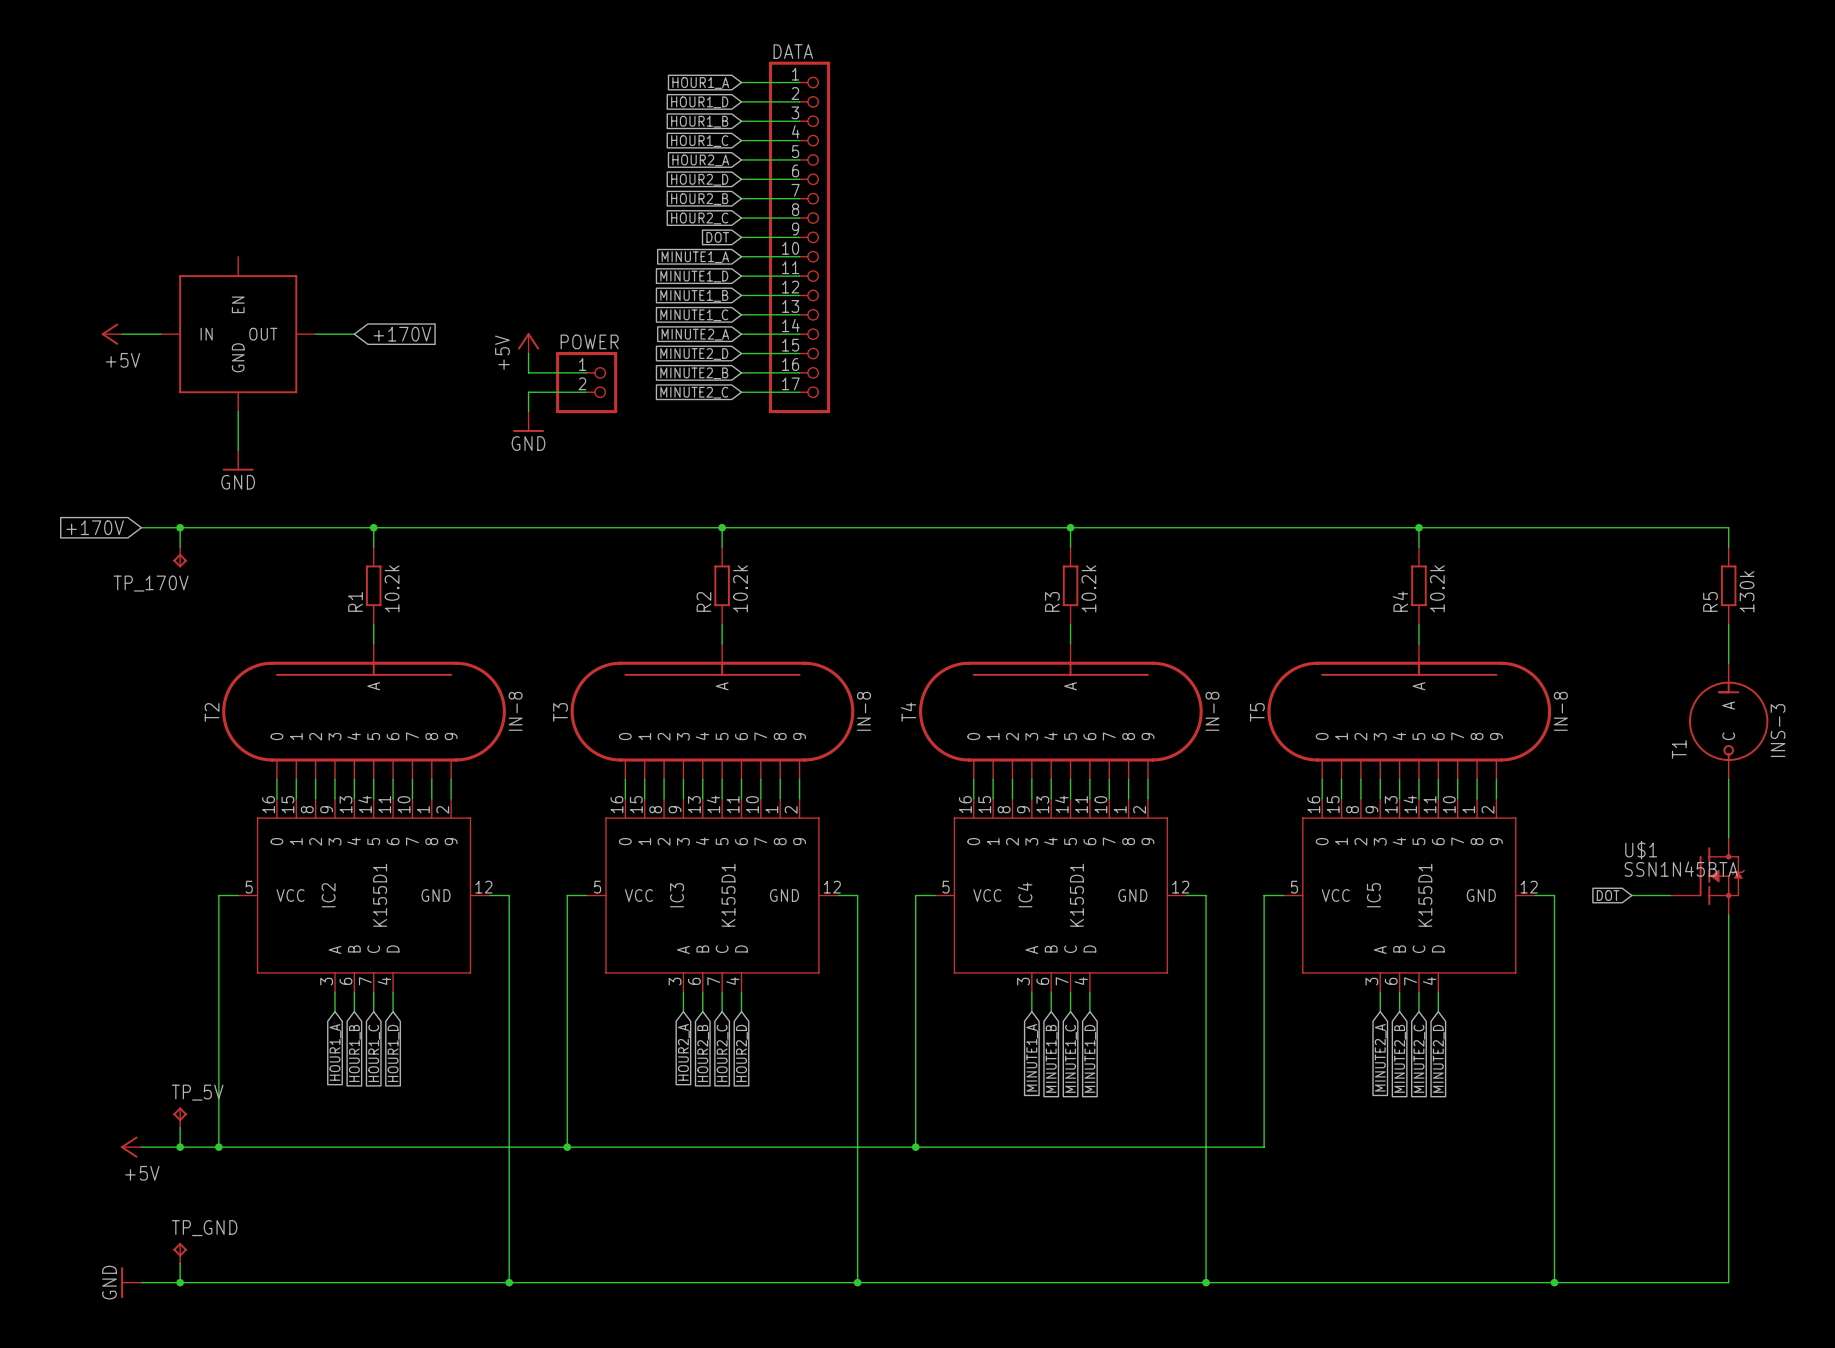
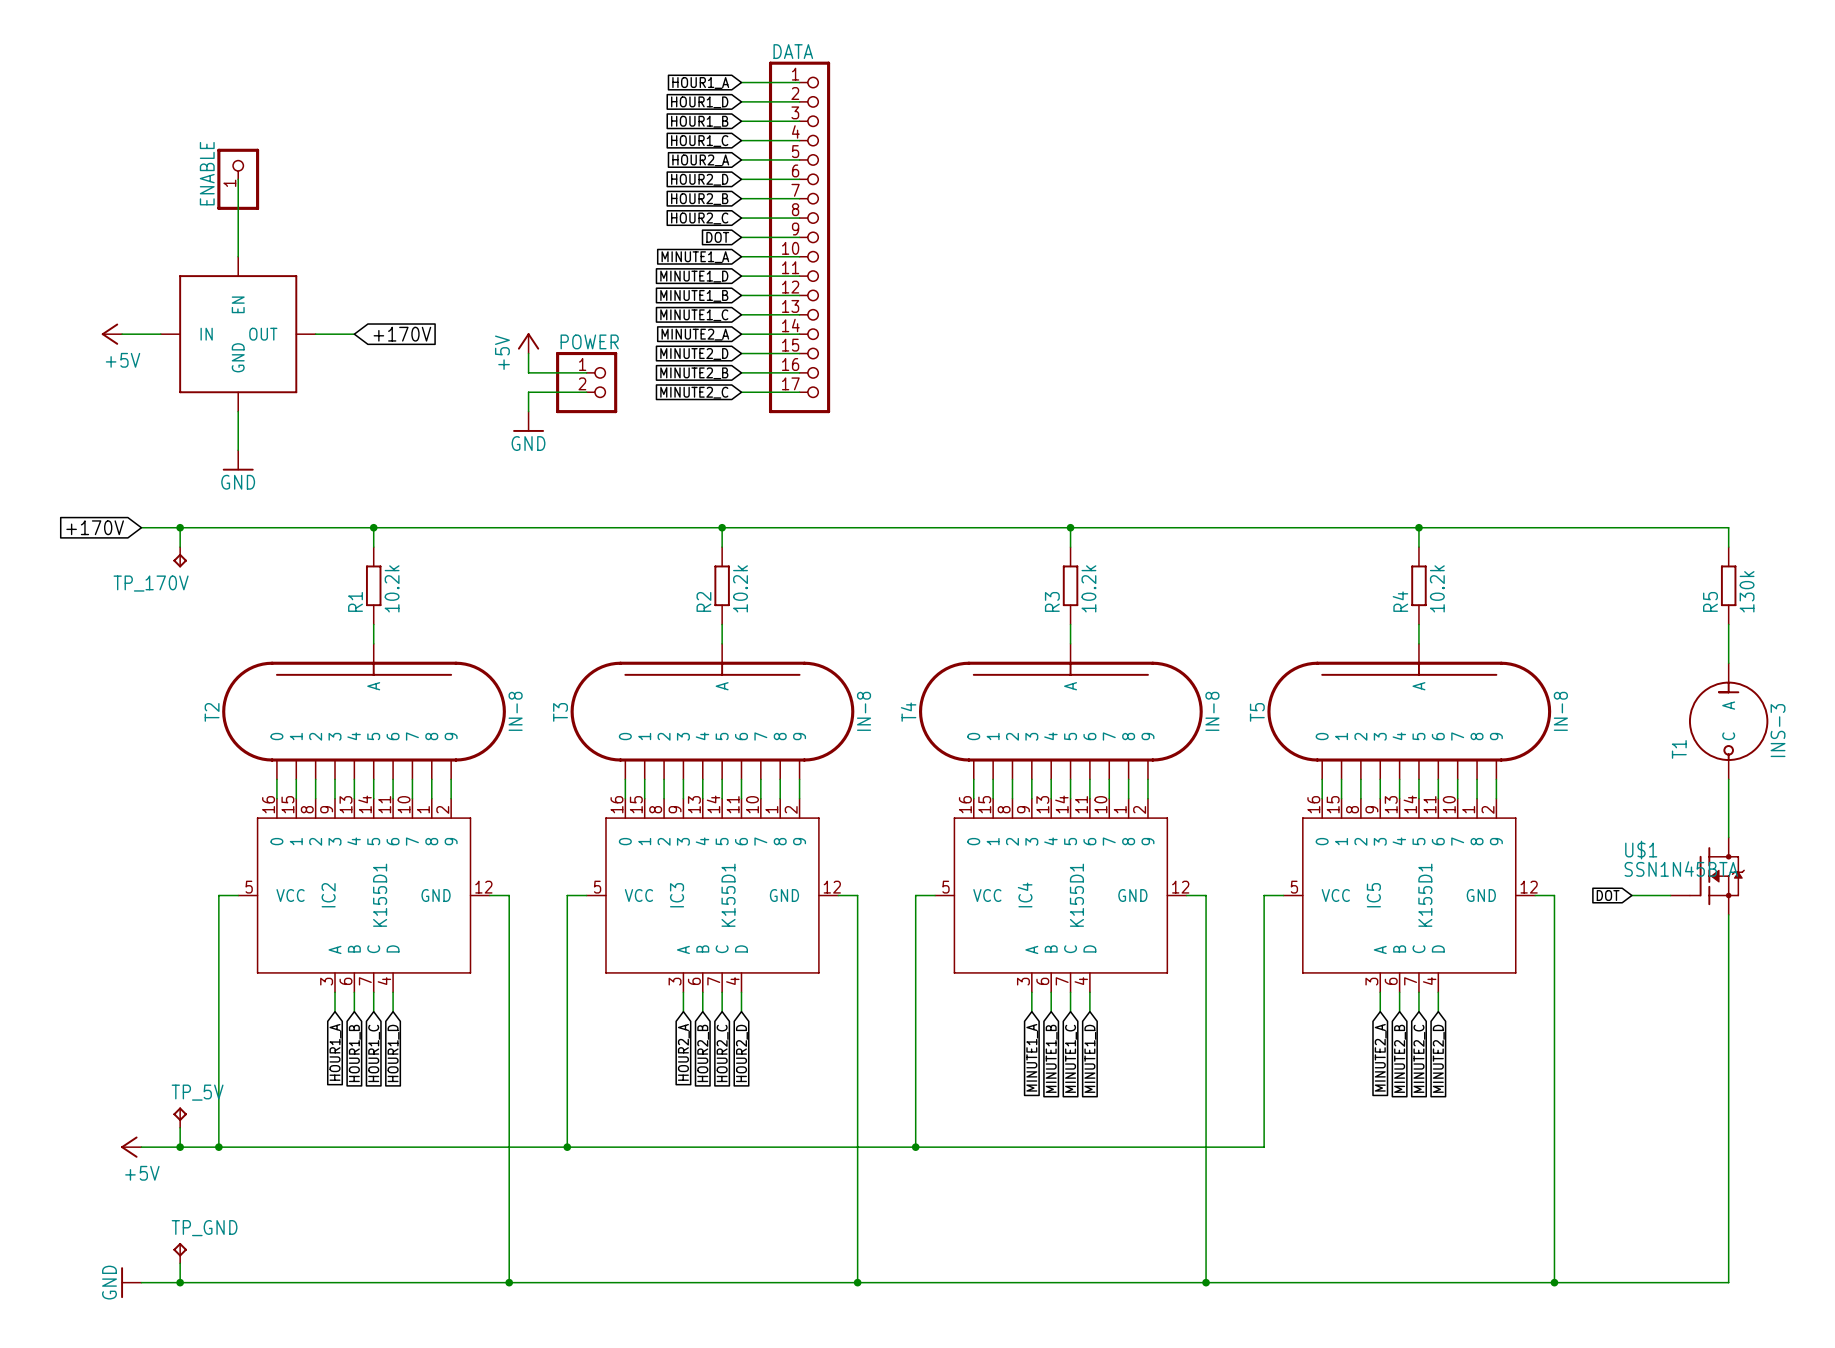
wire: none -> (238, 179) (238, 256)
ENABLE: none -> (238, 179)

